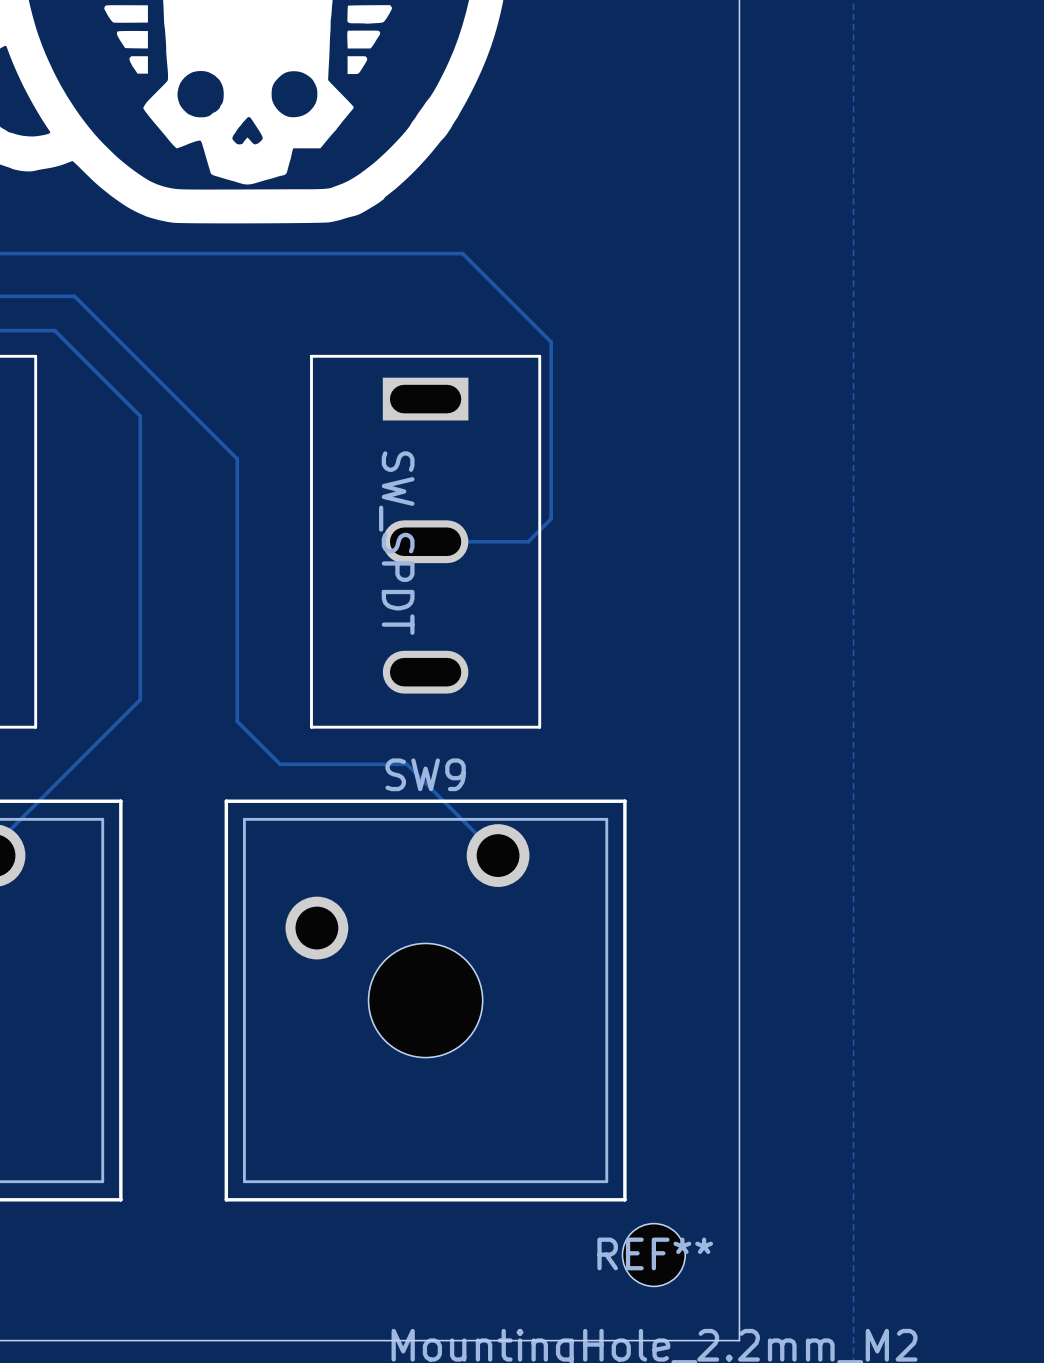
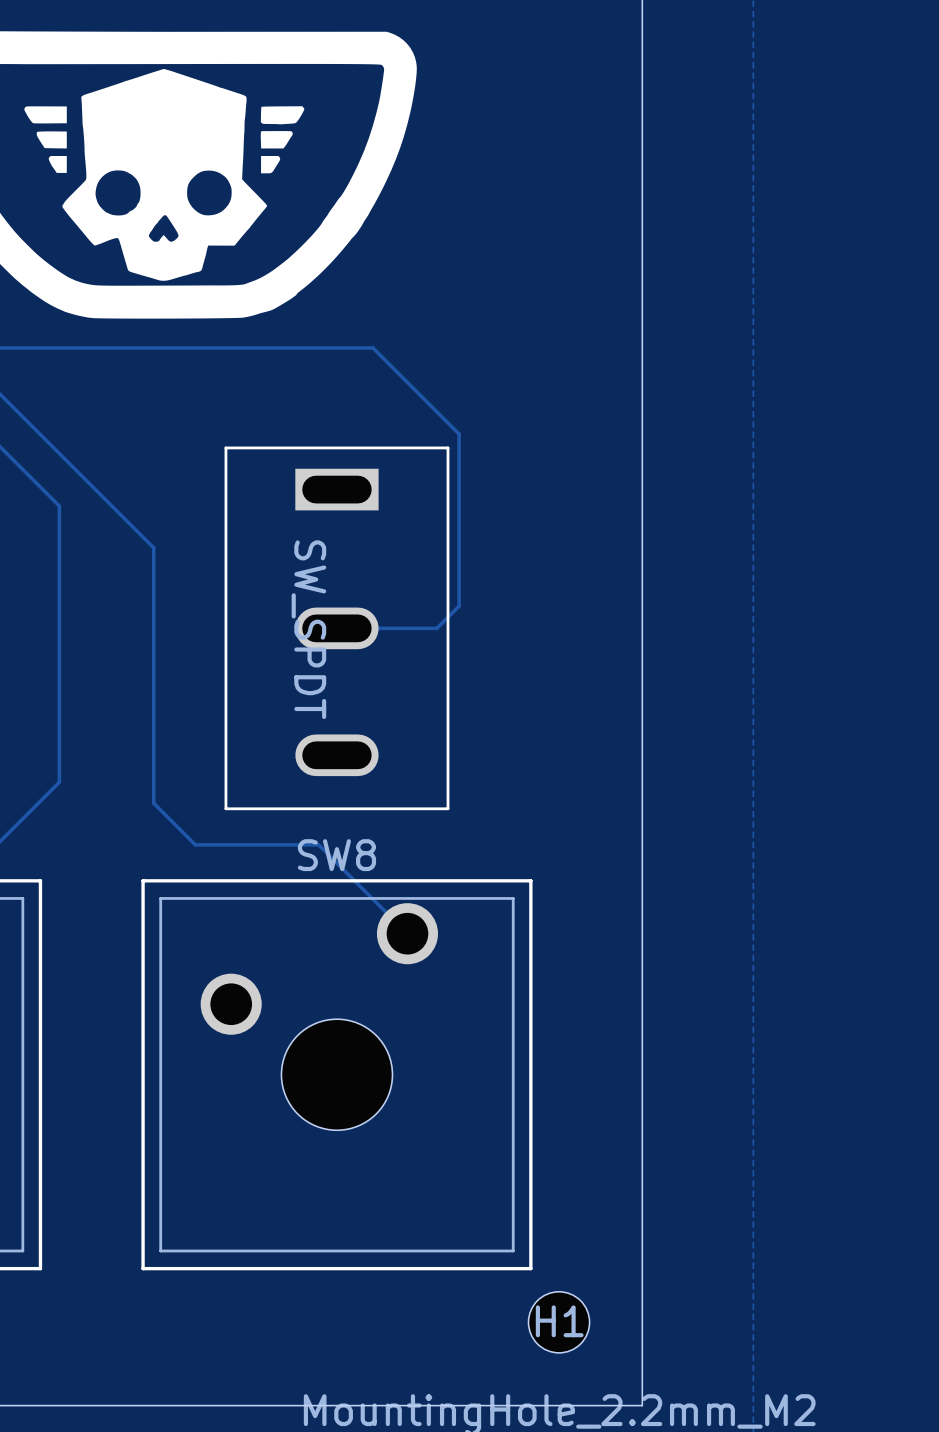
SW9 name: SW9 (425, 774) -> SW8 (336, 855)
REF** name: REF** (655, 1253) -> H1 (559, 1321)

